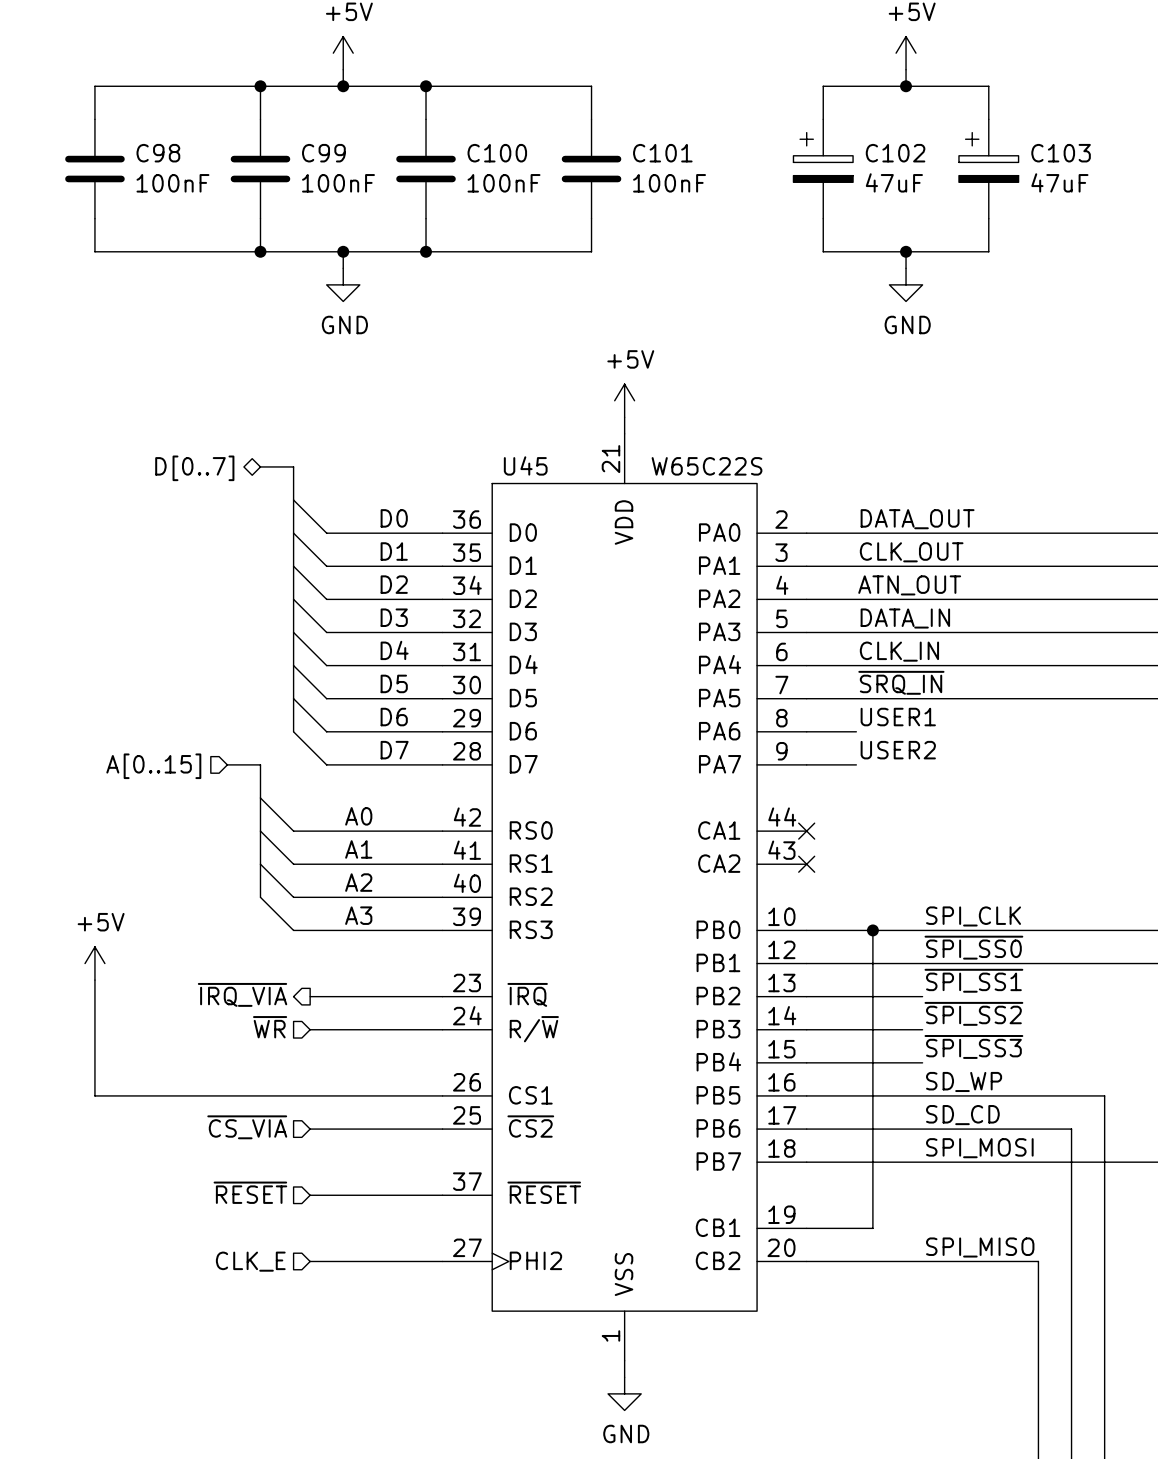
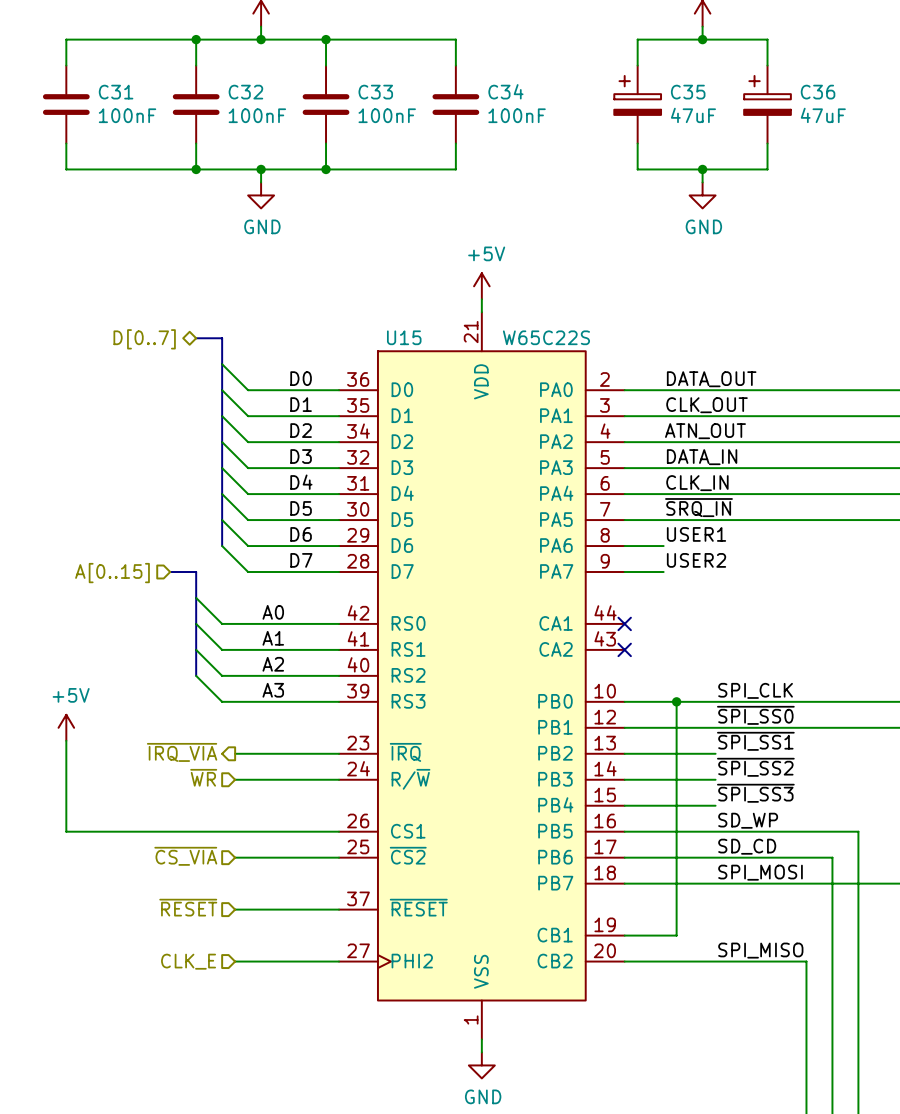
C98 name: C98 (158, 153) -> C31 (116, 92)
C99 name: C99 (323, 153) -> C32 (245, 92)
C100 name: C100 (497, 153) -> C33 (375, 92)
C101 name: C101 (662, 153) -> C34 (505, 91)
C102 name: C102 (895, 153) -> C35 (688, 92)
C103 name: C103 (1061, 153) -> C36 (818, 92)
U45 name: U45 (525, 465) -> U15 (404, 337)

